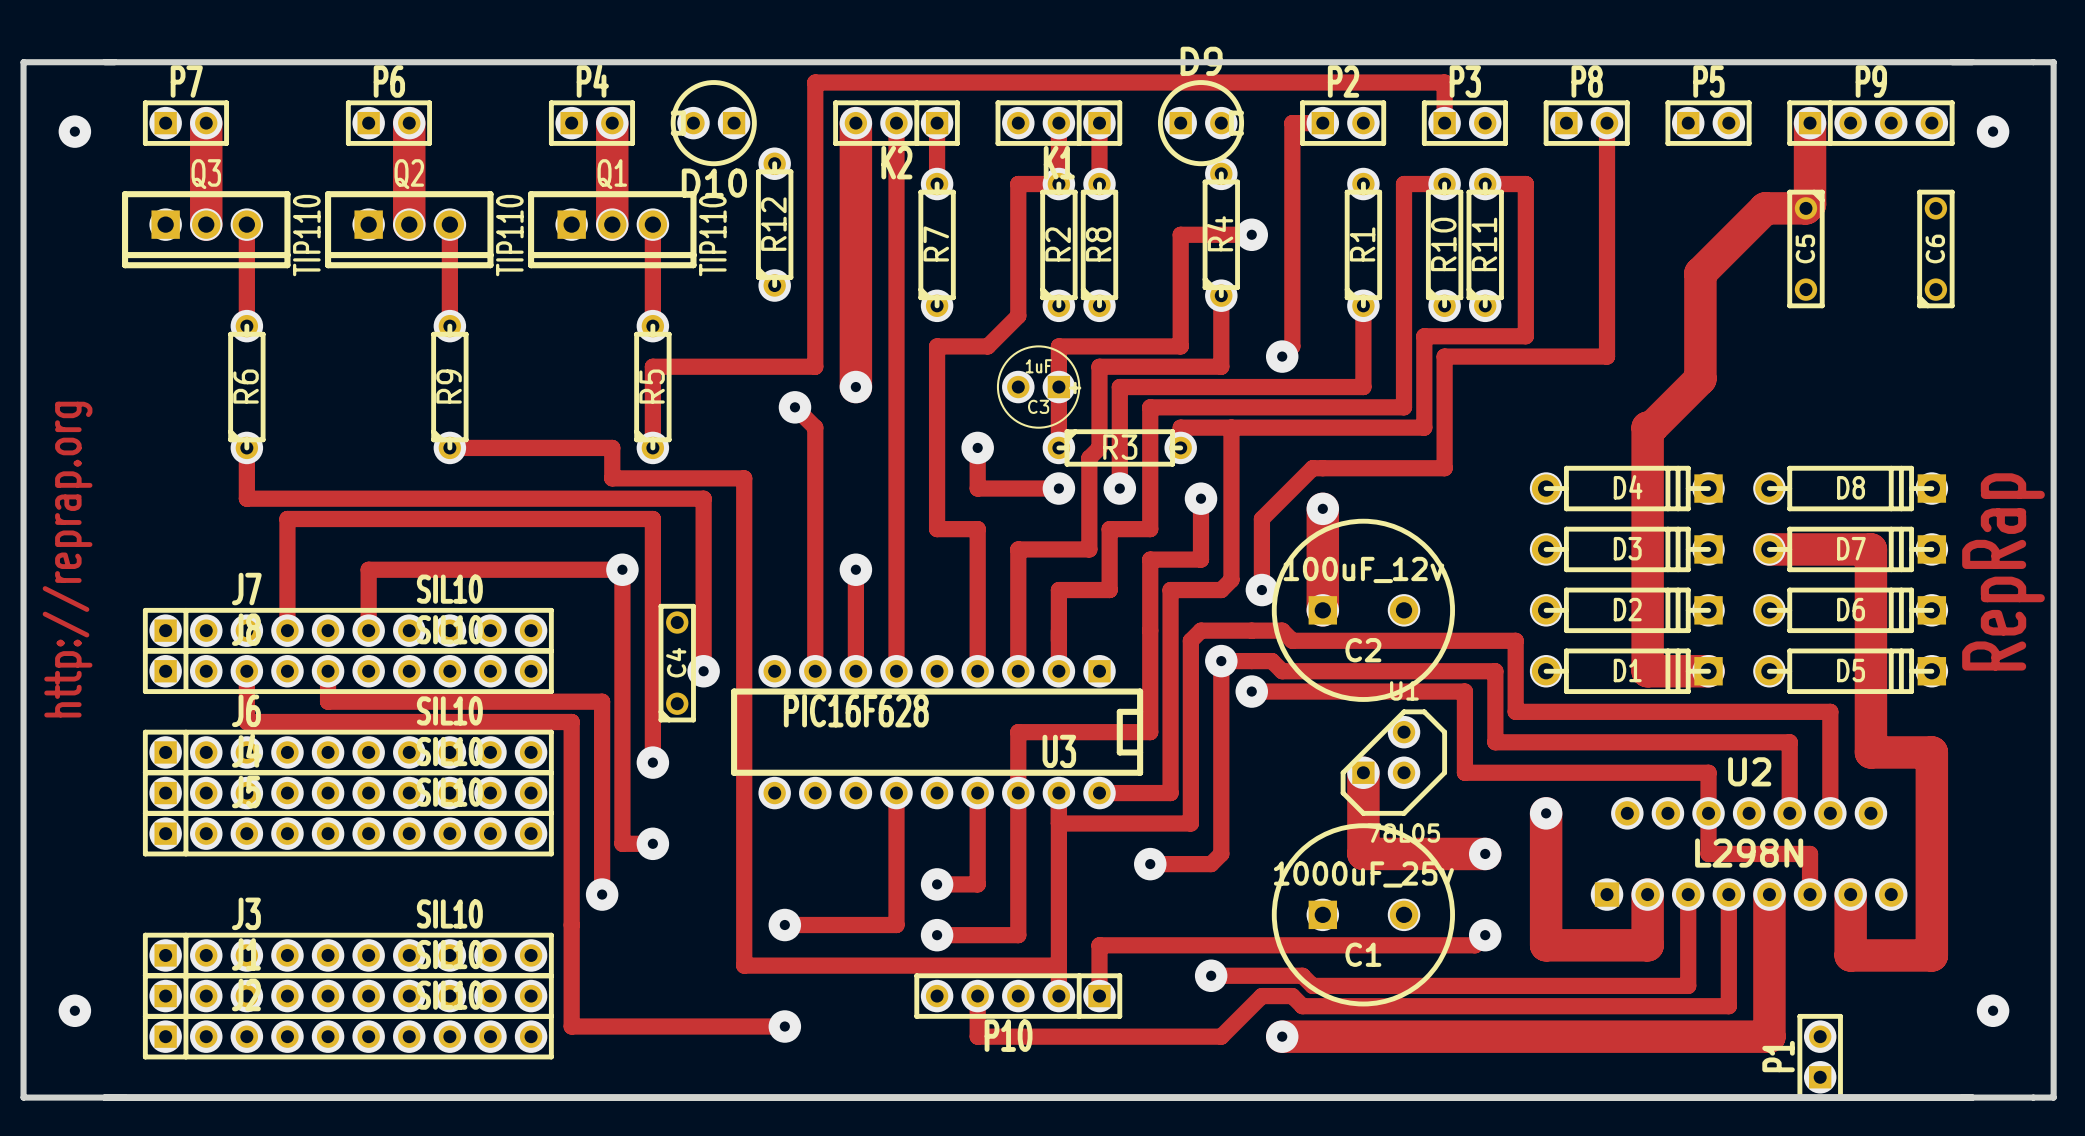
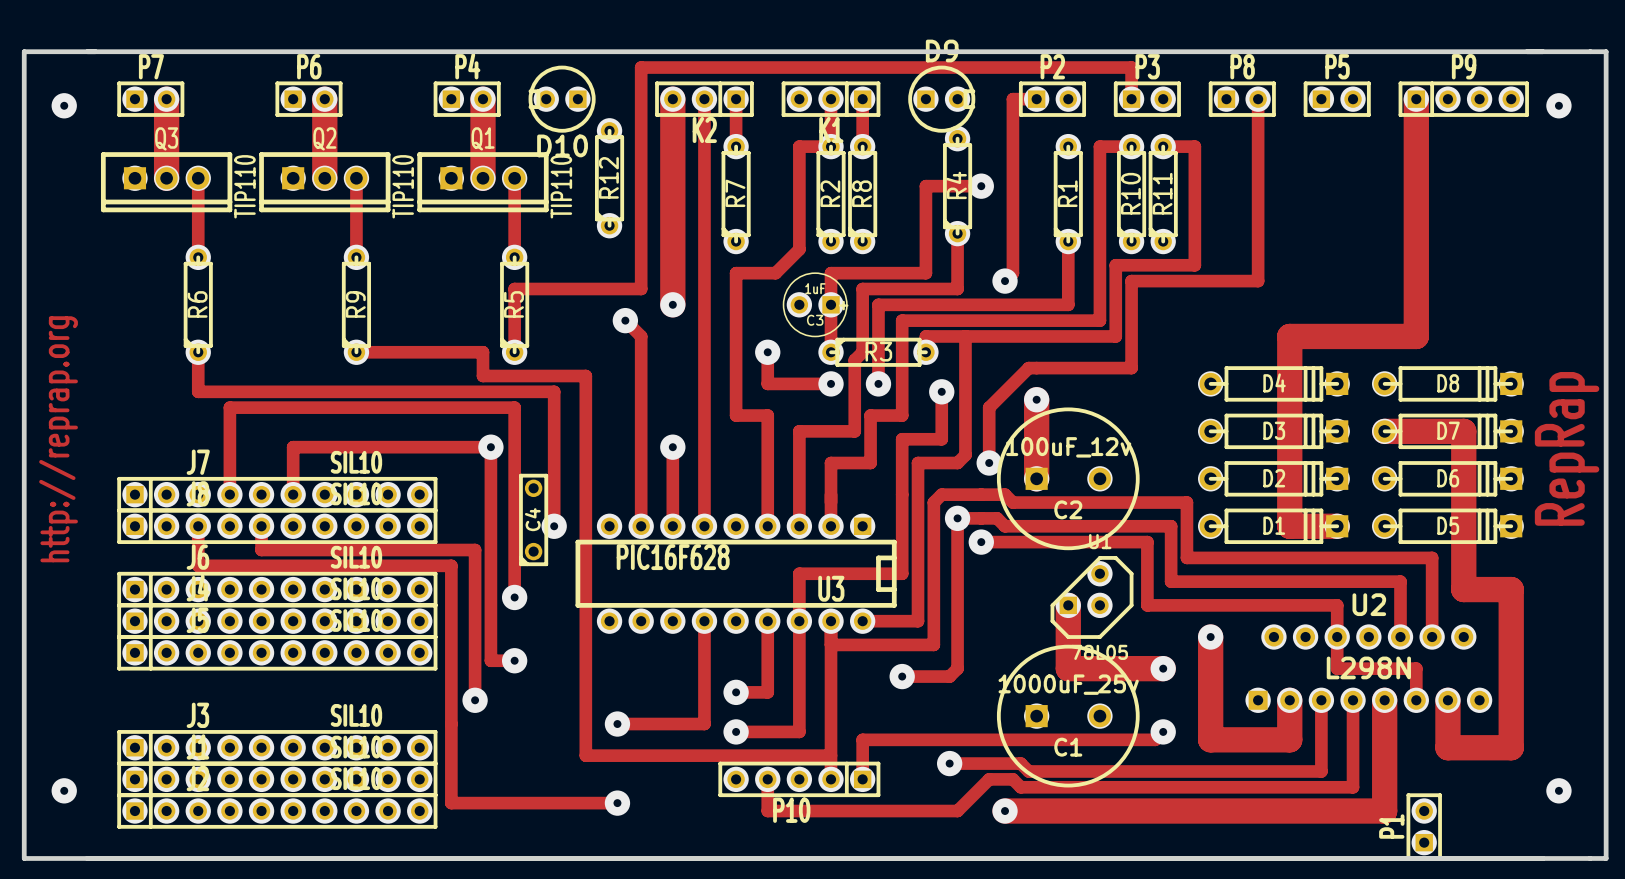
track: (1810, 204) (1805, 208) (1765, 208) (1700, 273) (1700, 378) (1651, 427) -> (1416, 162) (1416, 336)
C5: (1805, 248) -> none
C6: (1935, 248) -> none
track: none -> (1292, 336) (1416, 336)

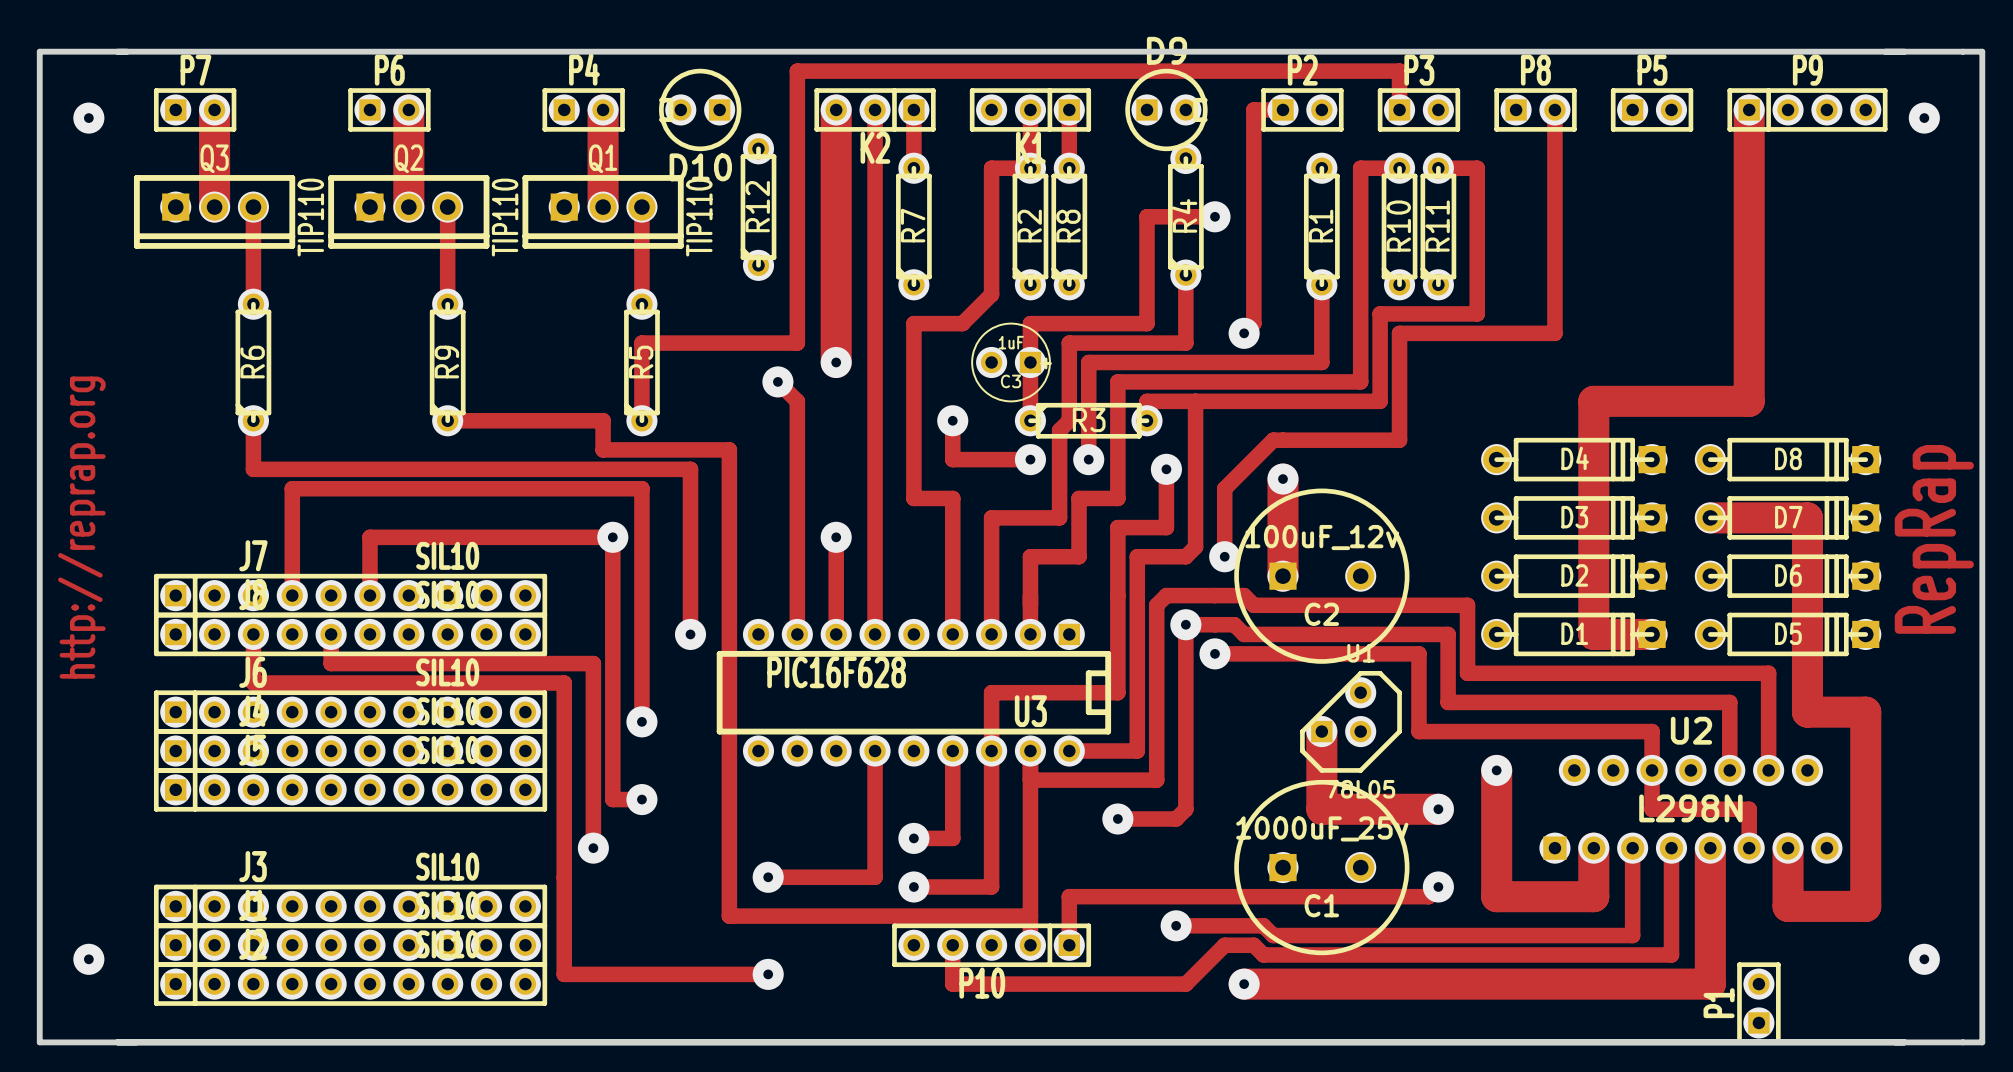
C4: (533, 519) -> none

